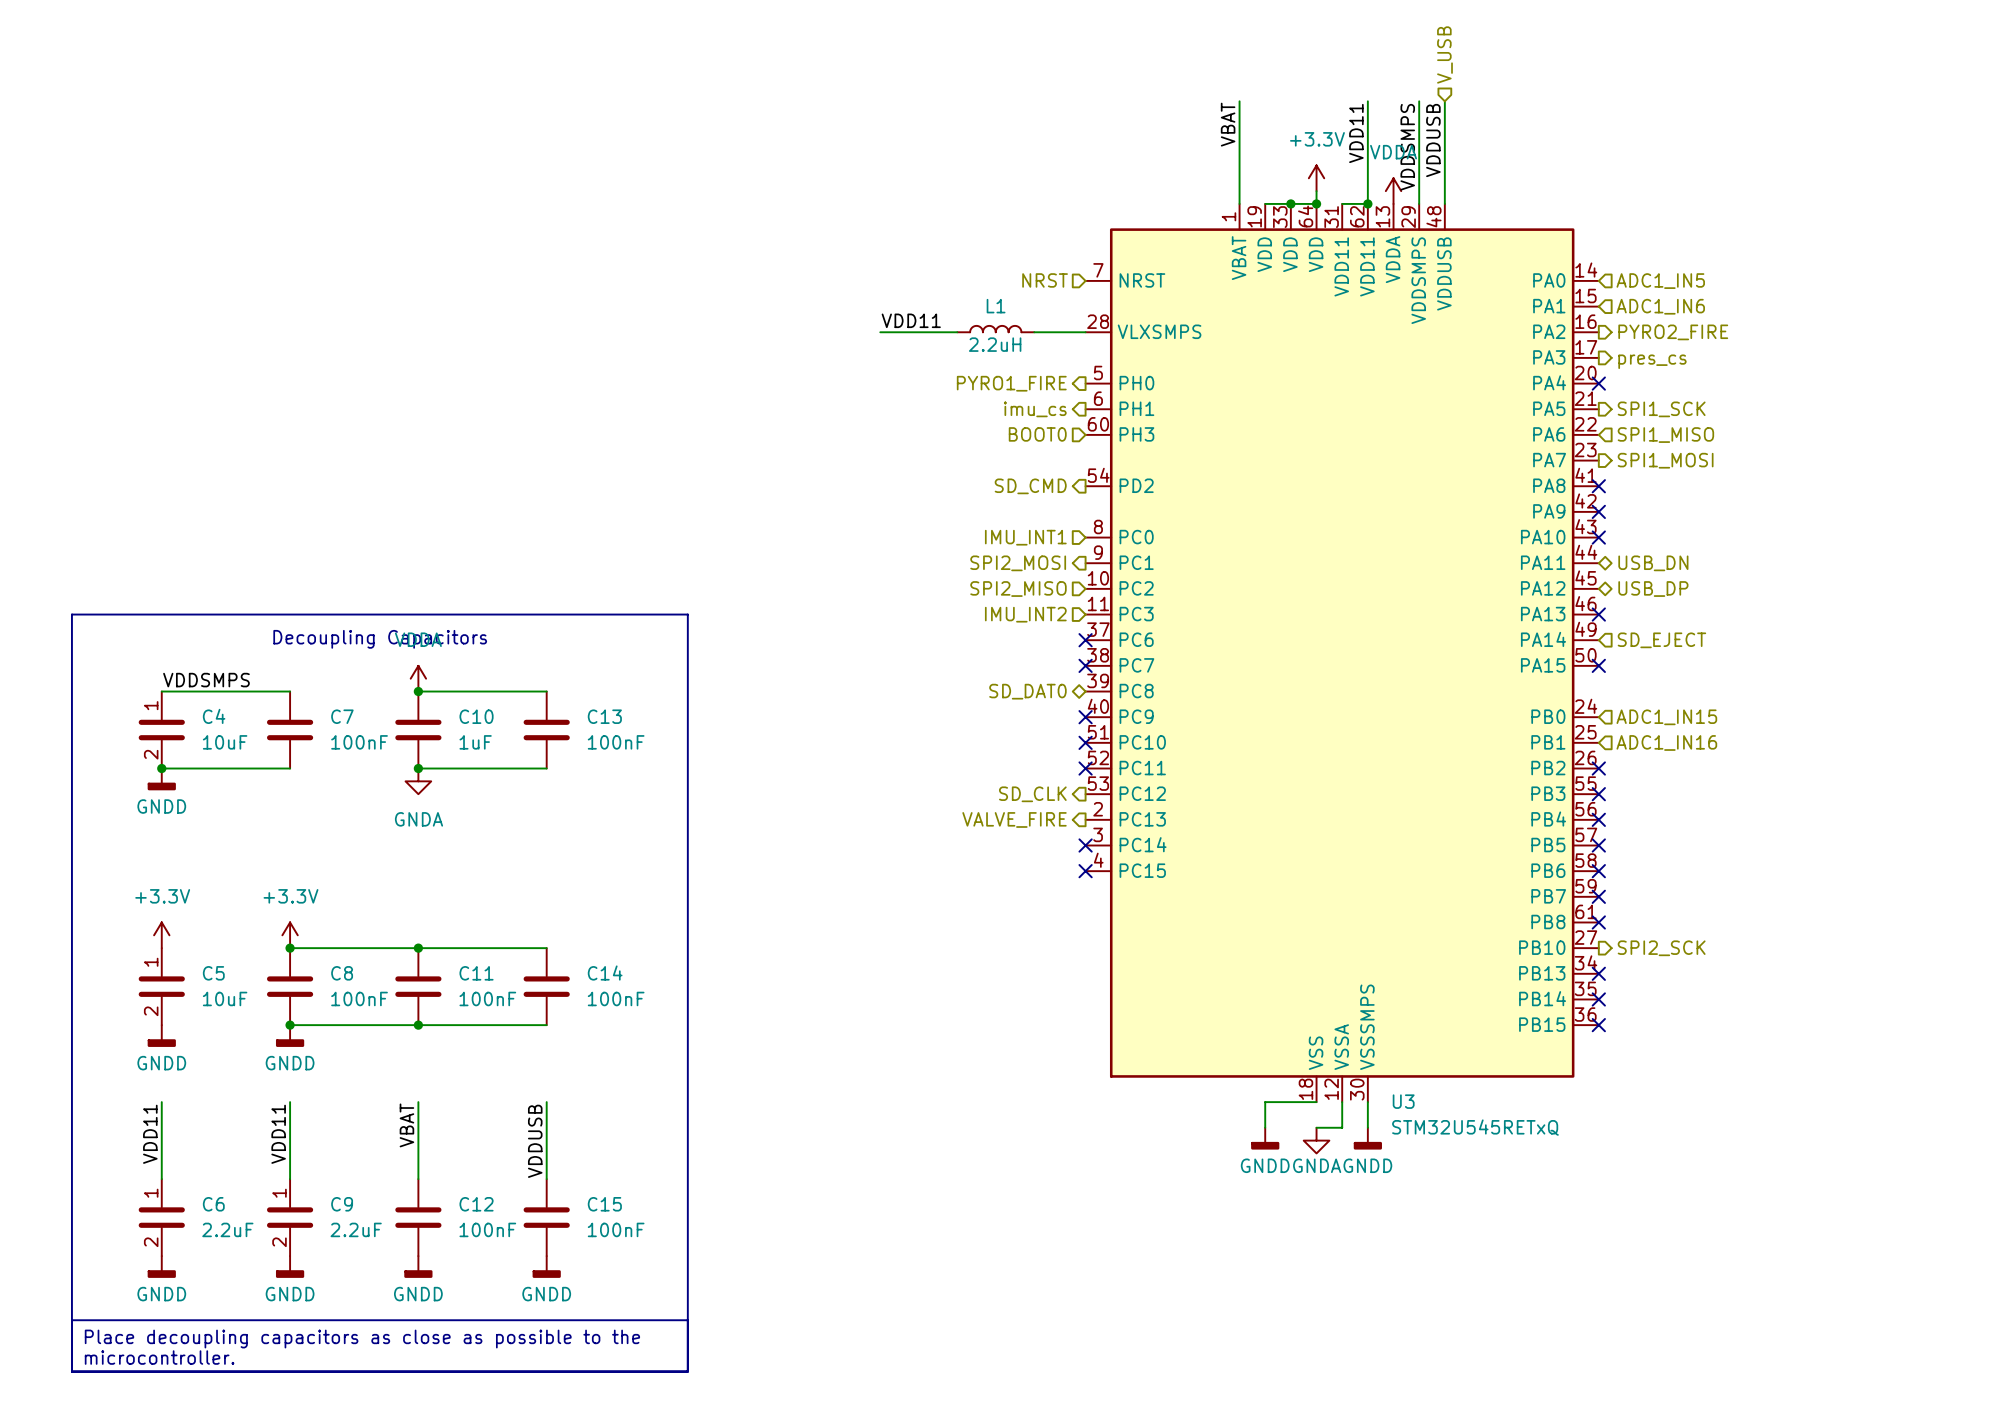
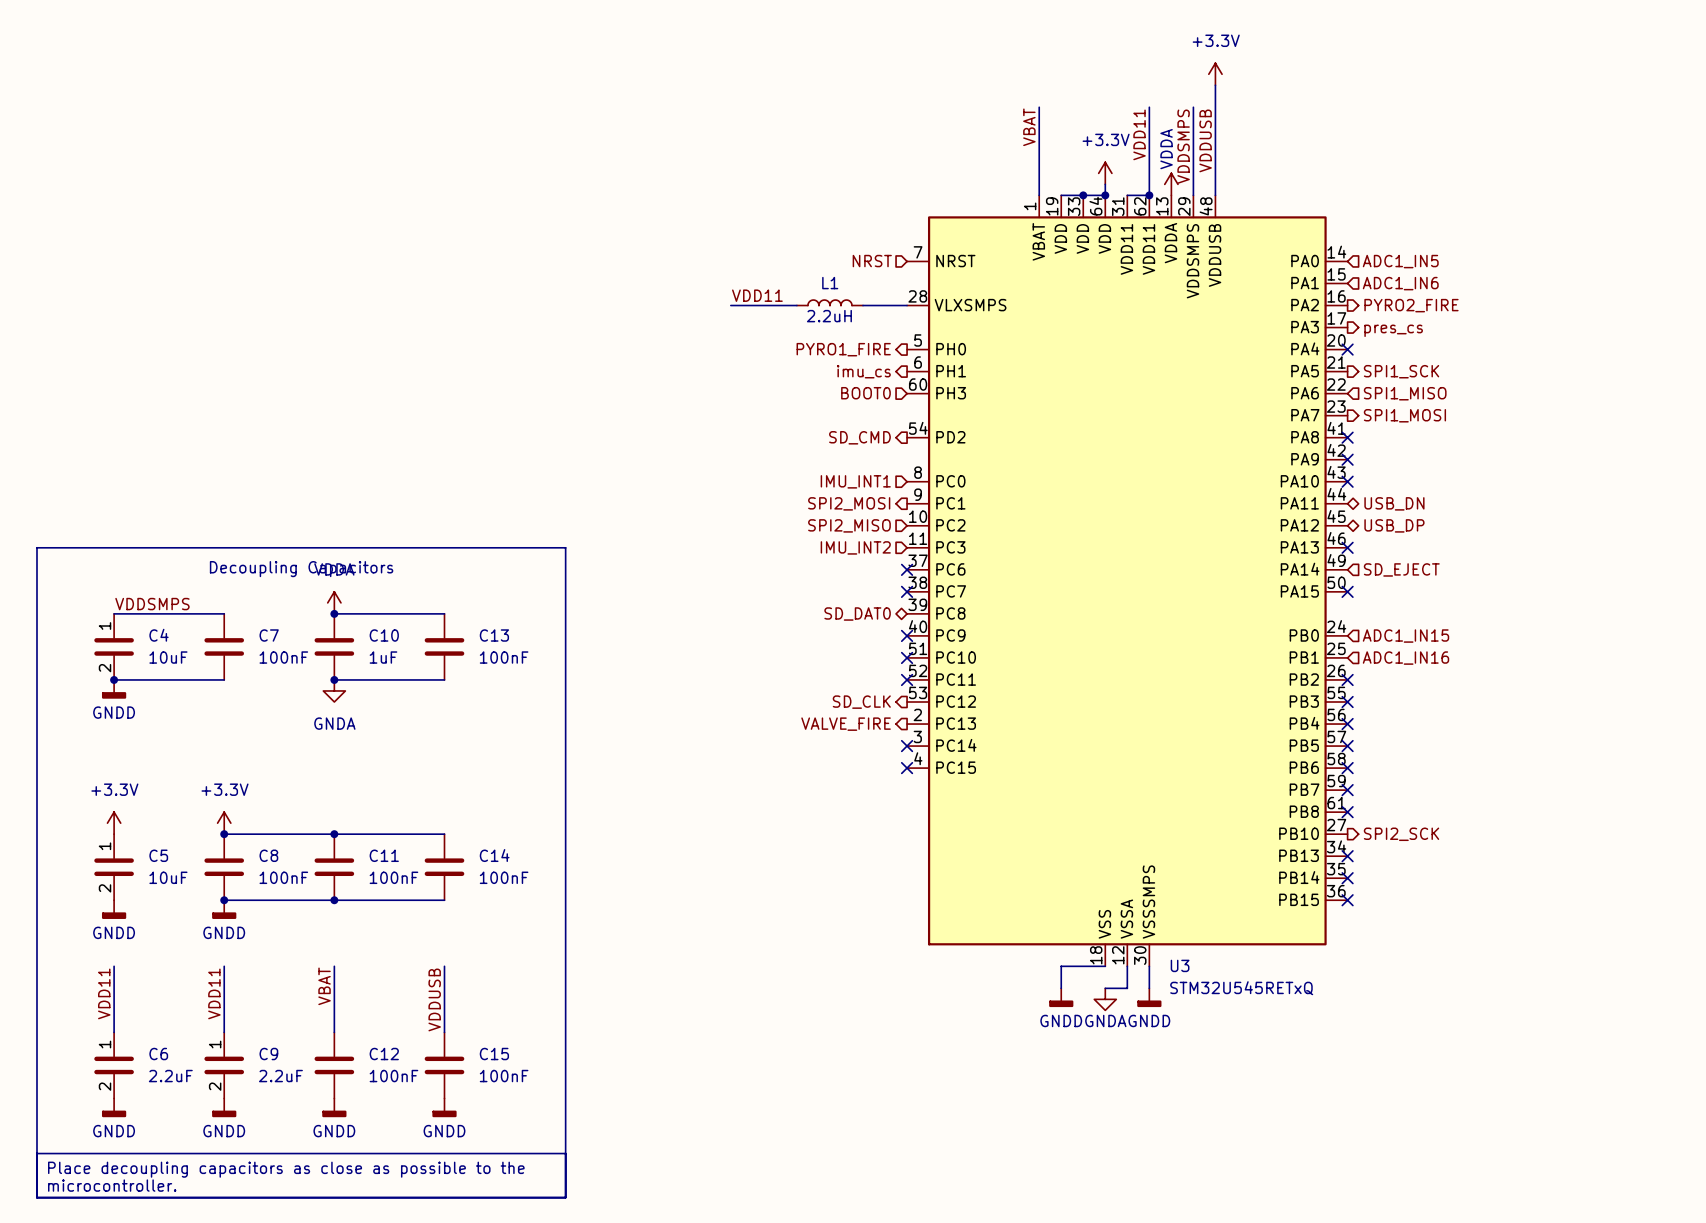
hierarchical label: V_USB (1444, 54) -> none
power symbol: none -> +3.3V (1215, 74)
wire: none -> (1215, 85) (1215, 107)
power symbol text rotation: 0° (1393, 152) -> 90° counterclockwise (1166, 149)

